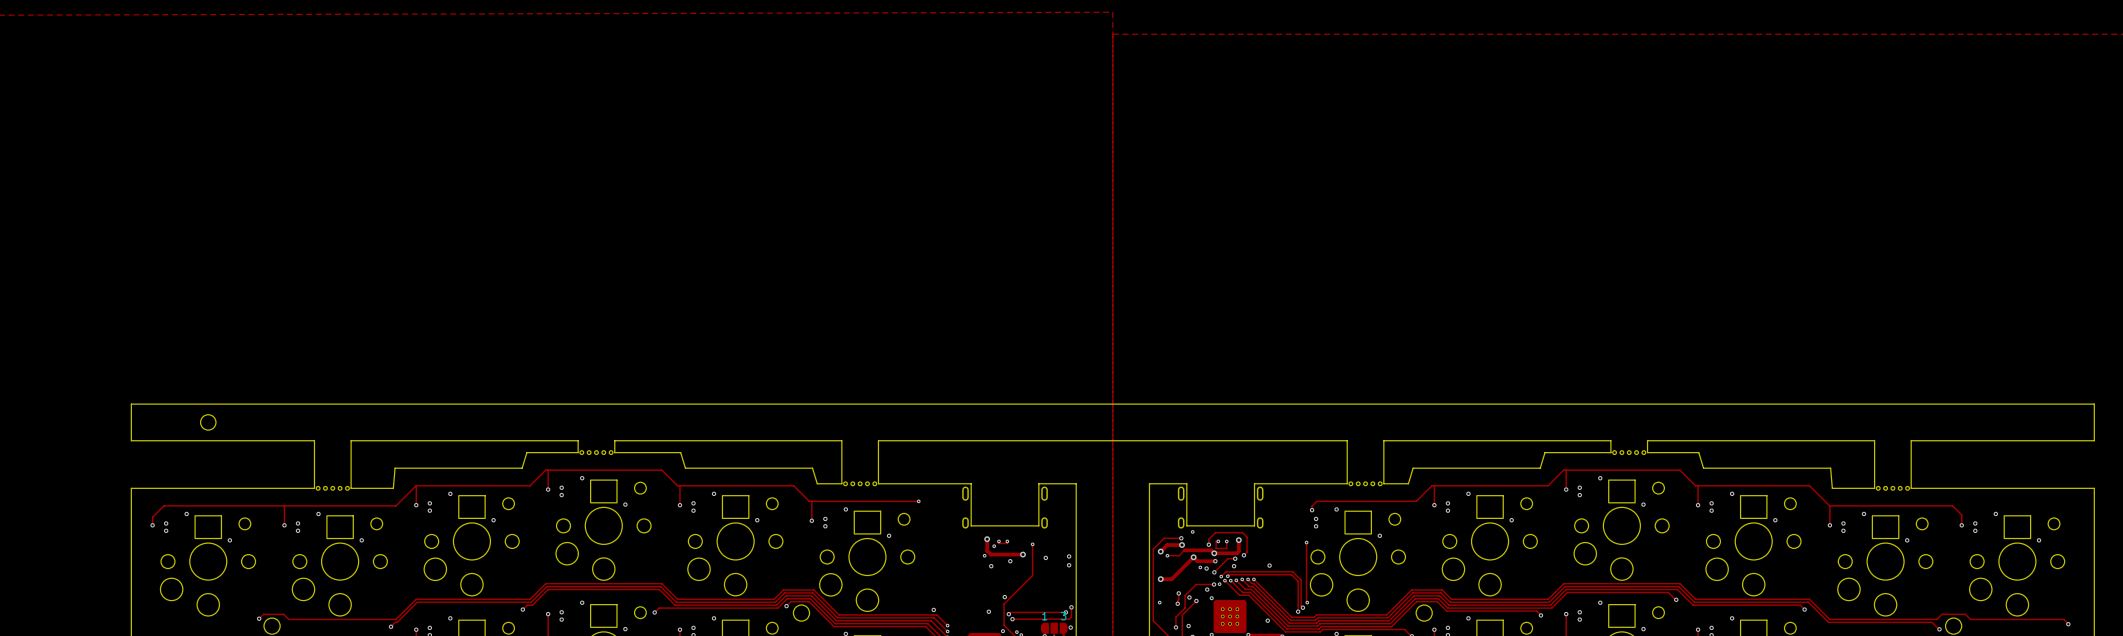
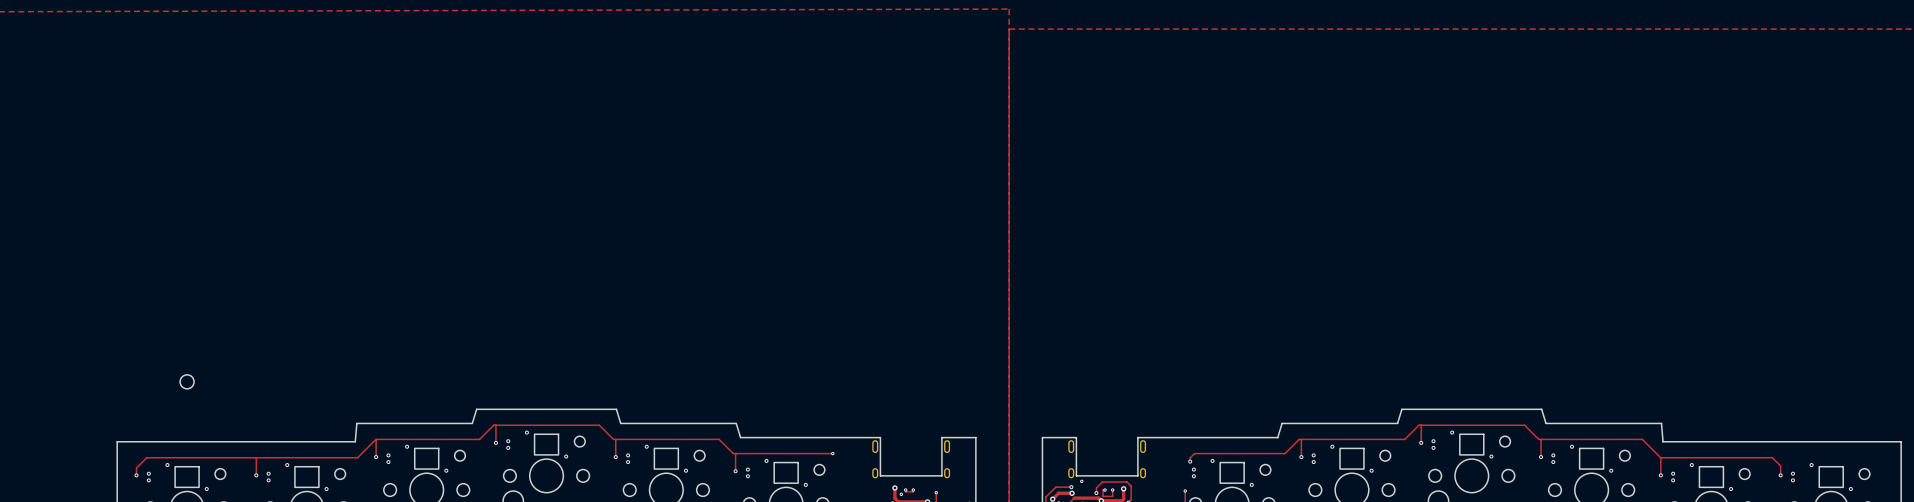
board edge: (578, 452) (578, 440) (351, 440) (351, 488) -> (283, 441) (316, 441)
part: (596, 452) -> none
board edge: (614, 452) (614, 440) (841, 440) (841, 483) -> (556, 409) (523, 409)
board edge: (1610, 452) (1610, 440) (1383, 440) (1383, 483) -> (1461, 409) (1495, 409)
part: (1629, 452) -> none
board edge: (1647, 452) (1647, 440) (1874, 440) (1874, 488) -> (1734, 441) (1701, 441)
part: (860, 483) -> none
board edge: (878, 483) (878, 440) (1347, 440) (1347, 483) -> (796, 437) (762, 437)
board edge: none -> (1222, 437) (1255, 437)
part: (1365, 483) -> none
board edge: (314, 488) (314, 440) (131, 440) (131, 404) (2094, 404) (2094, 440) (1911, 440) (1911, 488) -> none
part: (332, 488) -> none
part: (1892, 488) -> none

